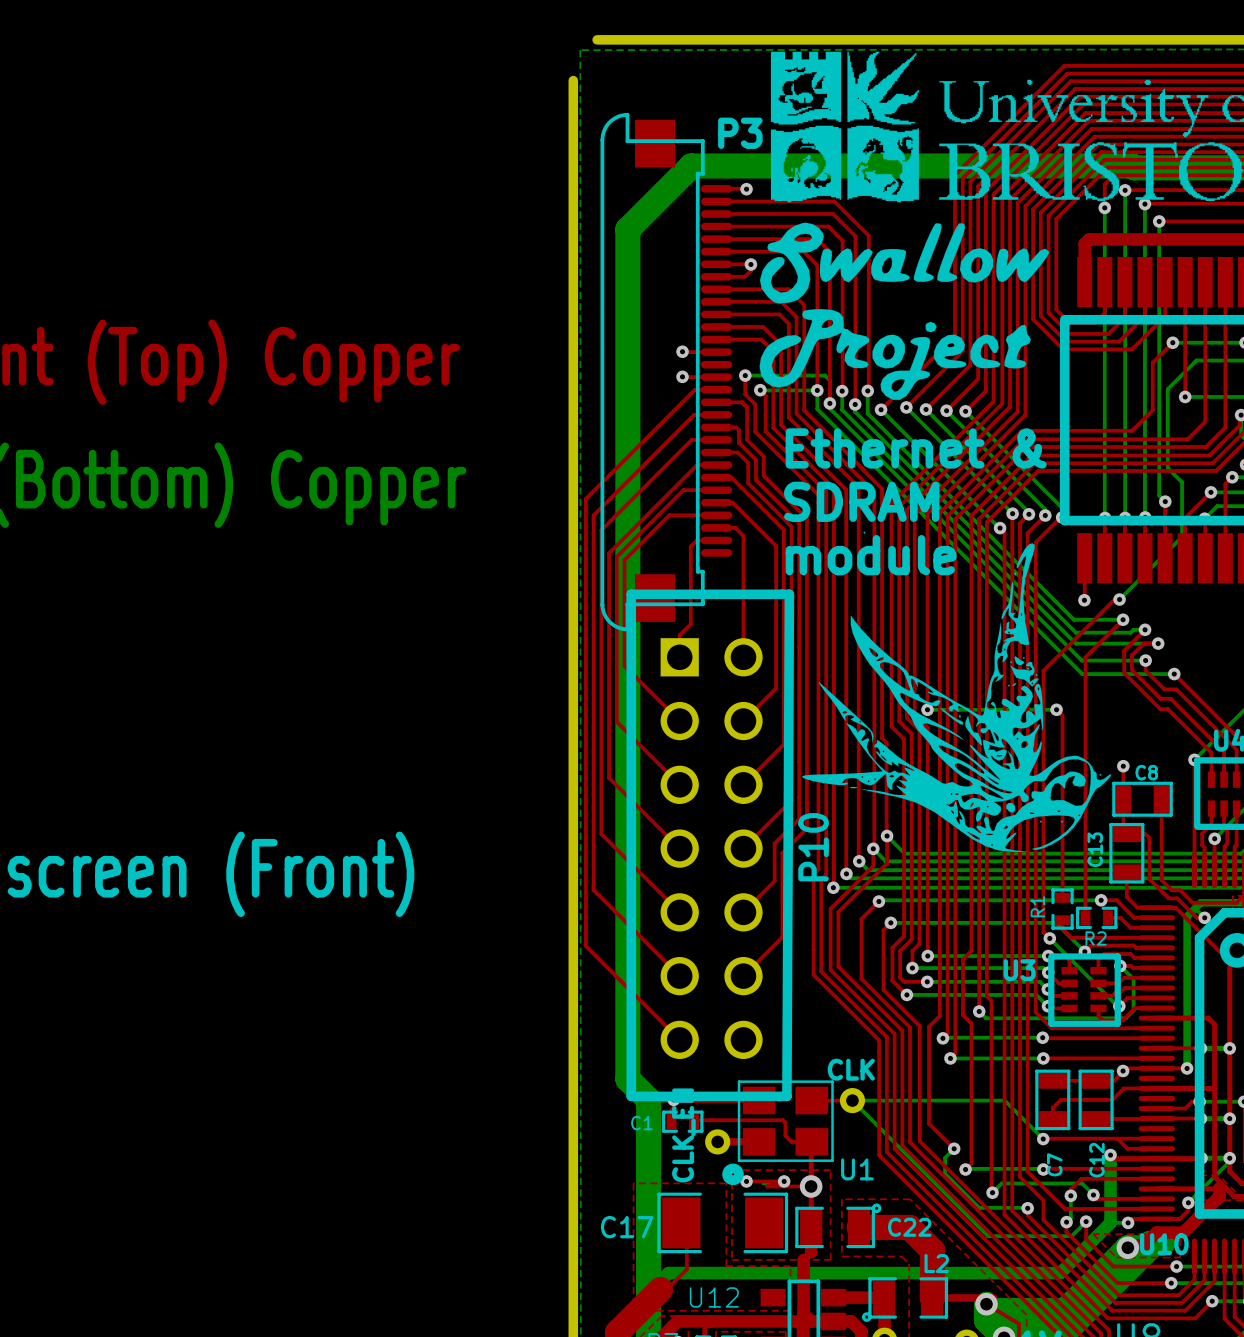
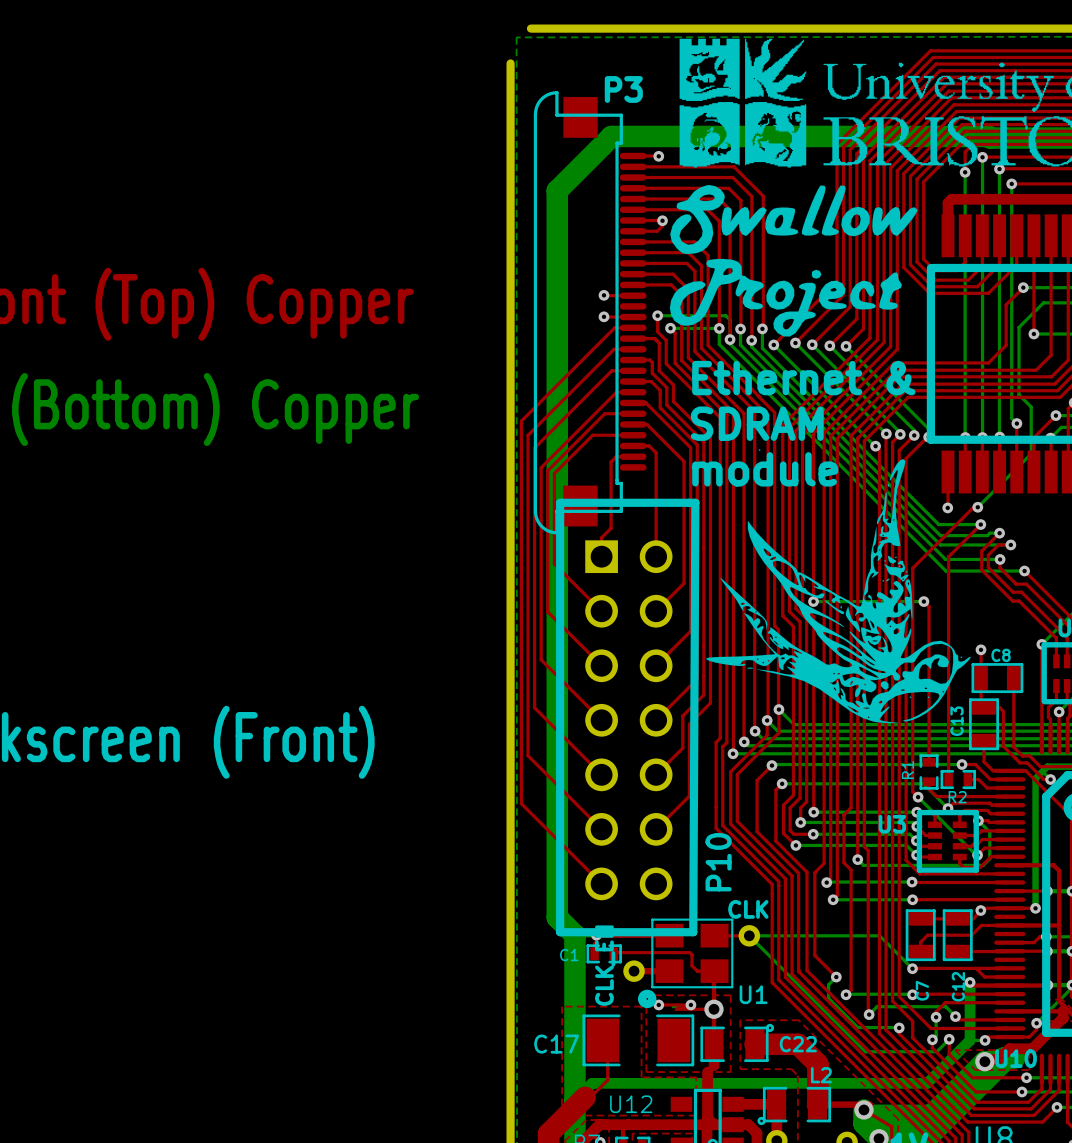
P3 name position: P3 (740, 133) -> P3 (623, 89)
P10 name position: P10 (813, 847) -> P10 (718, 862)

